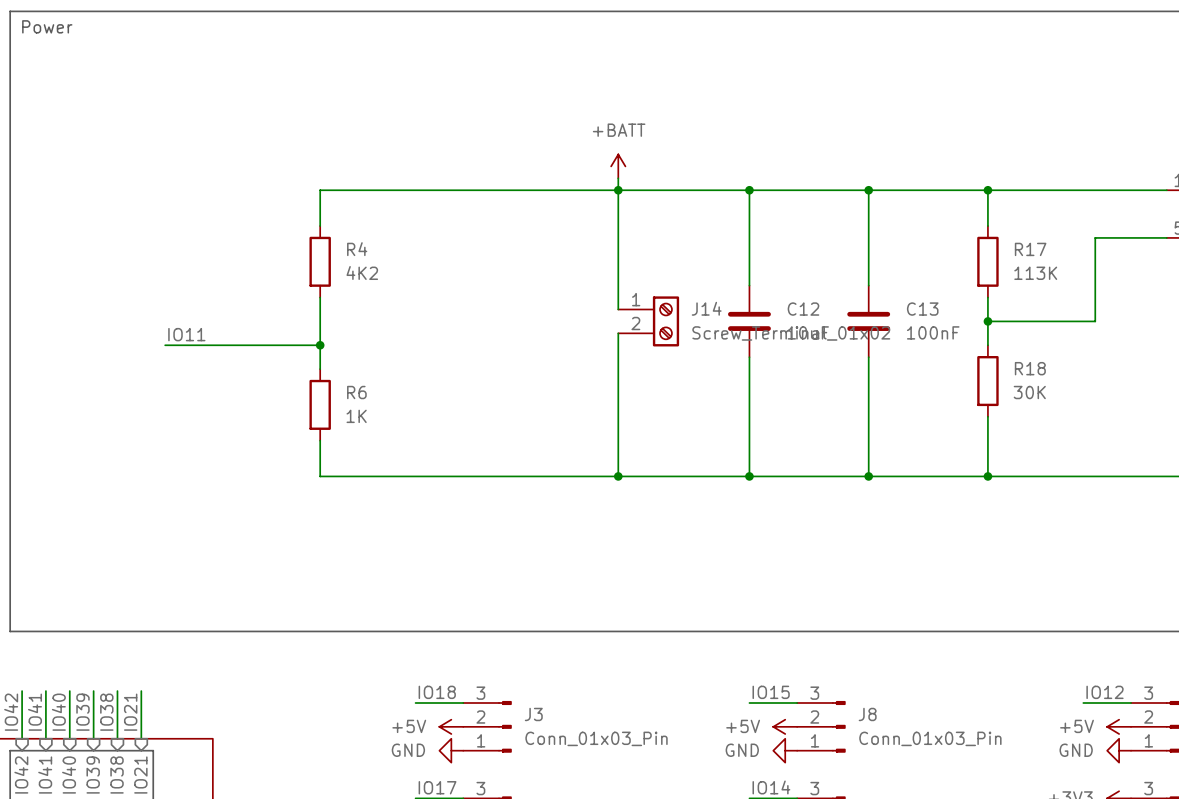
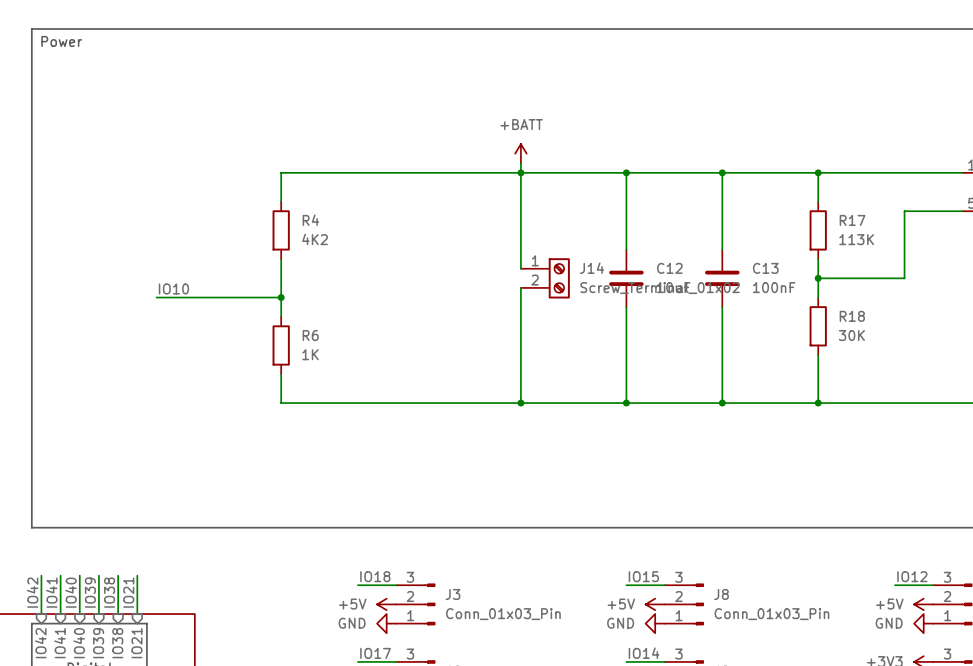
label: IO11 (186, 334) -> IO10 (173, 288)

